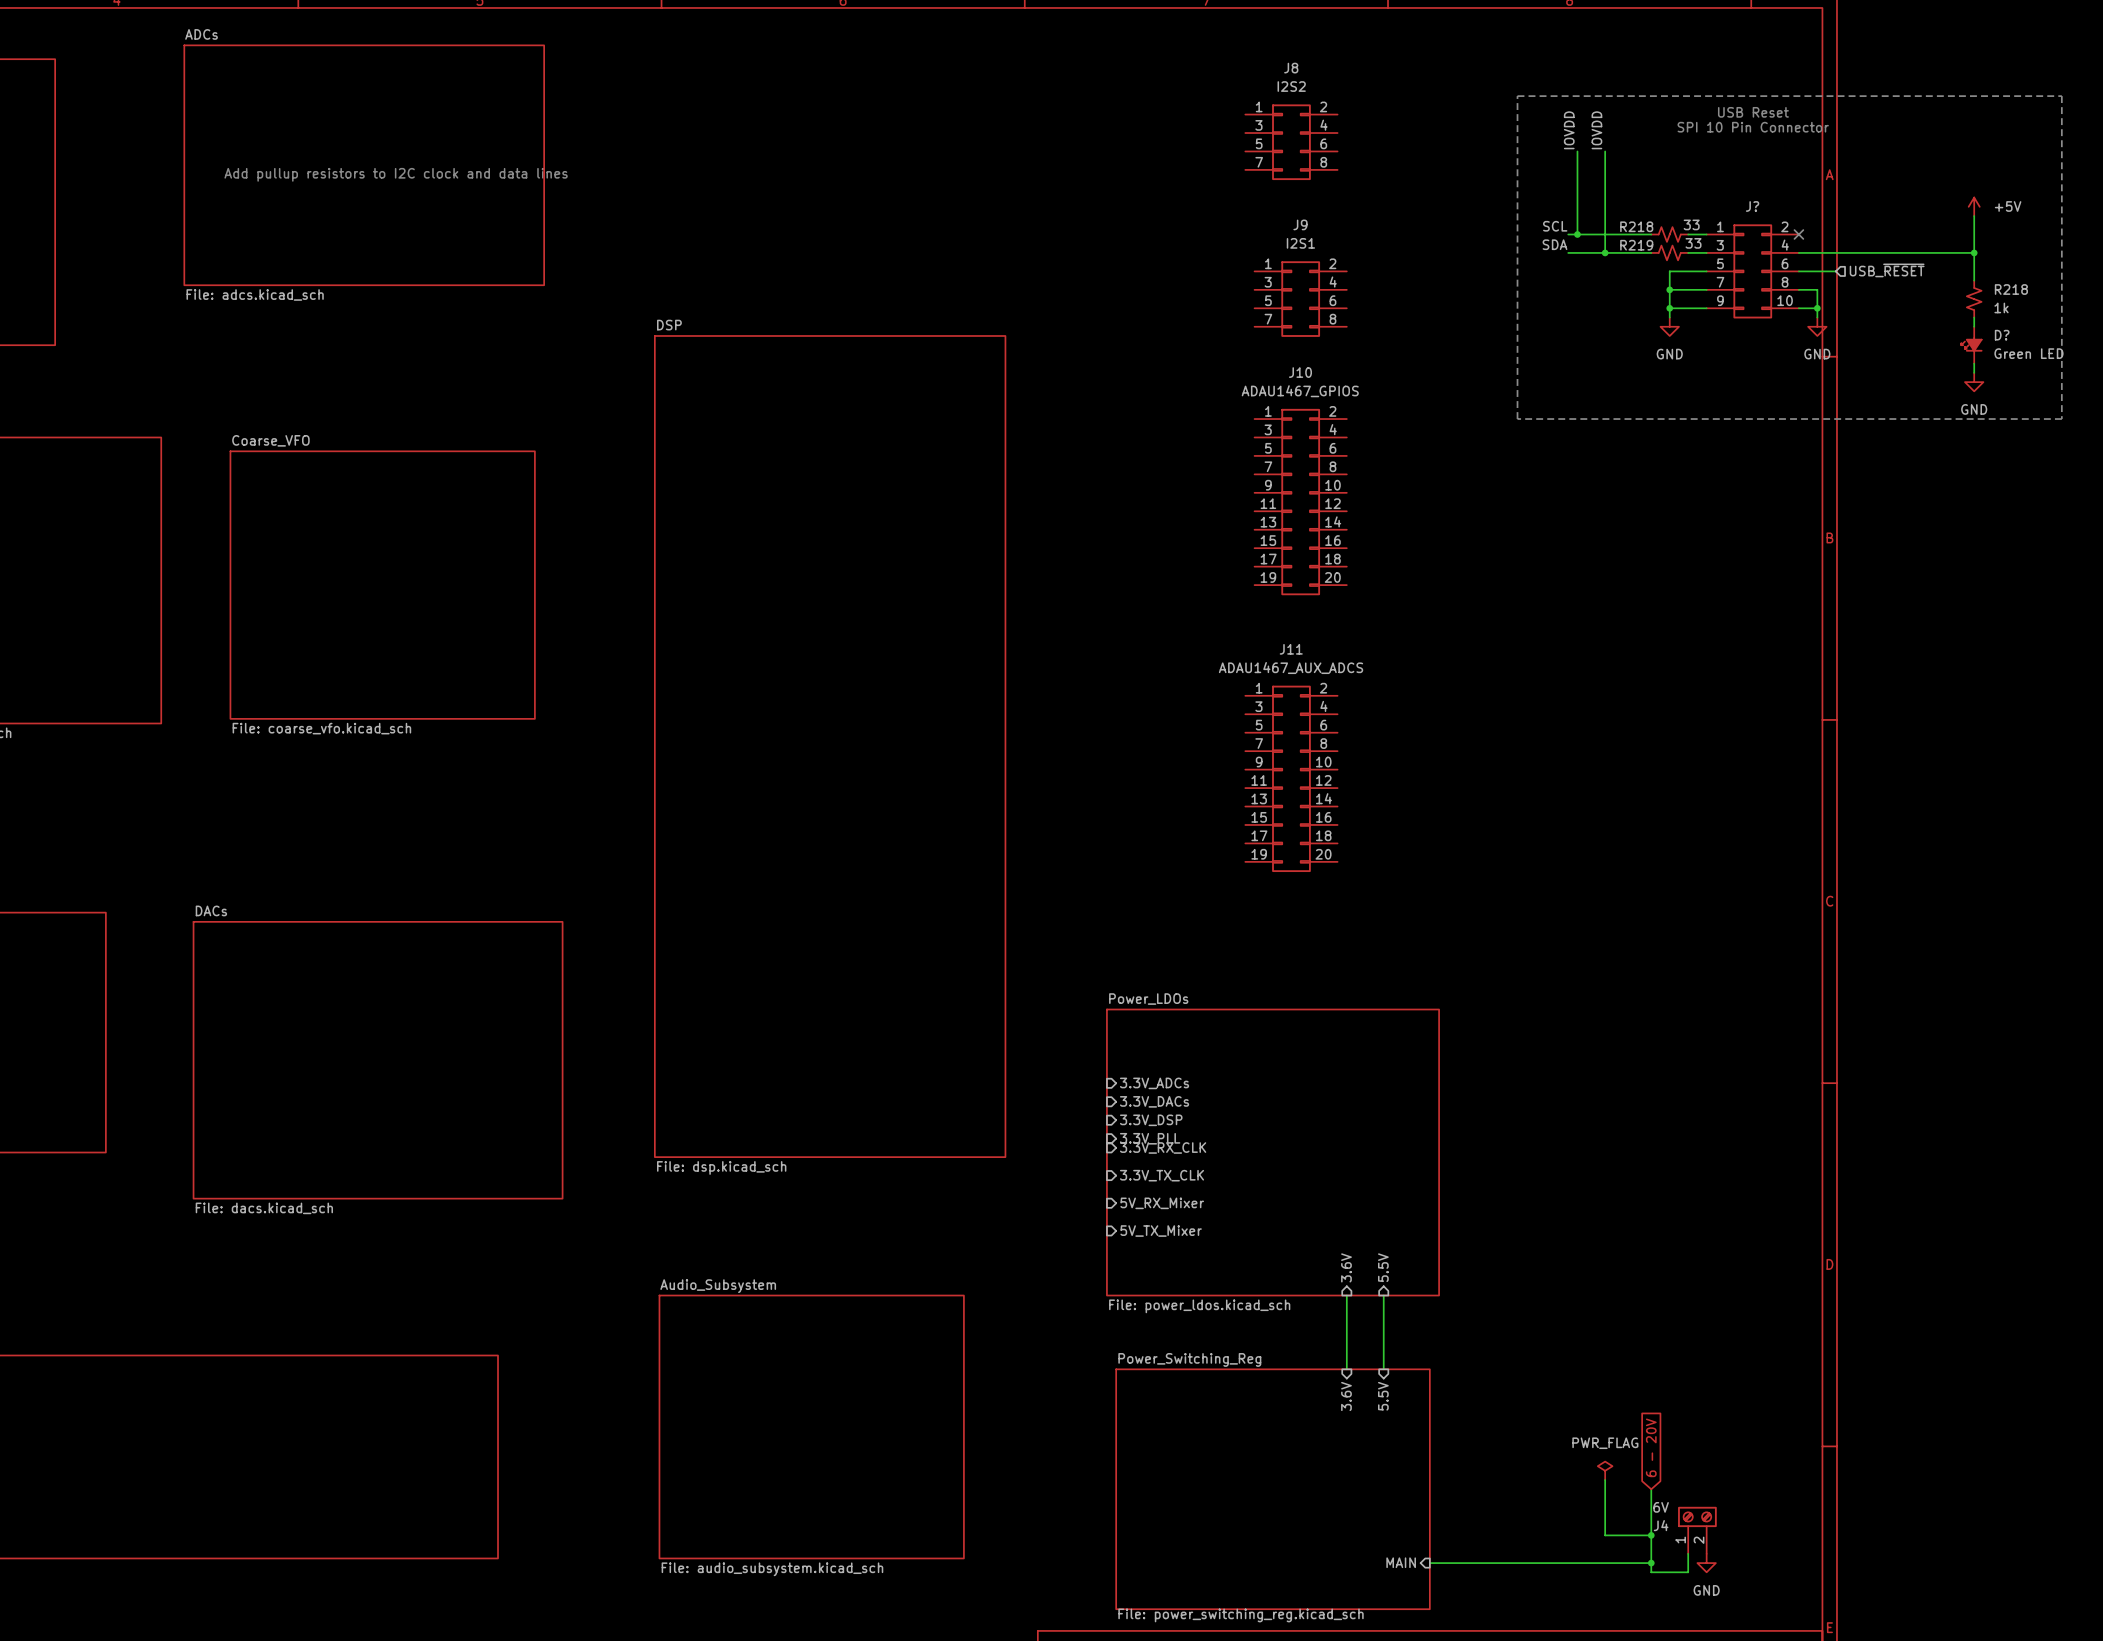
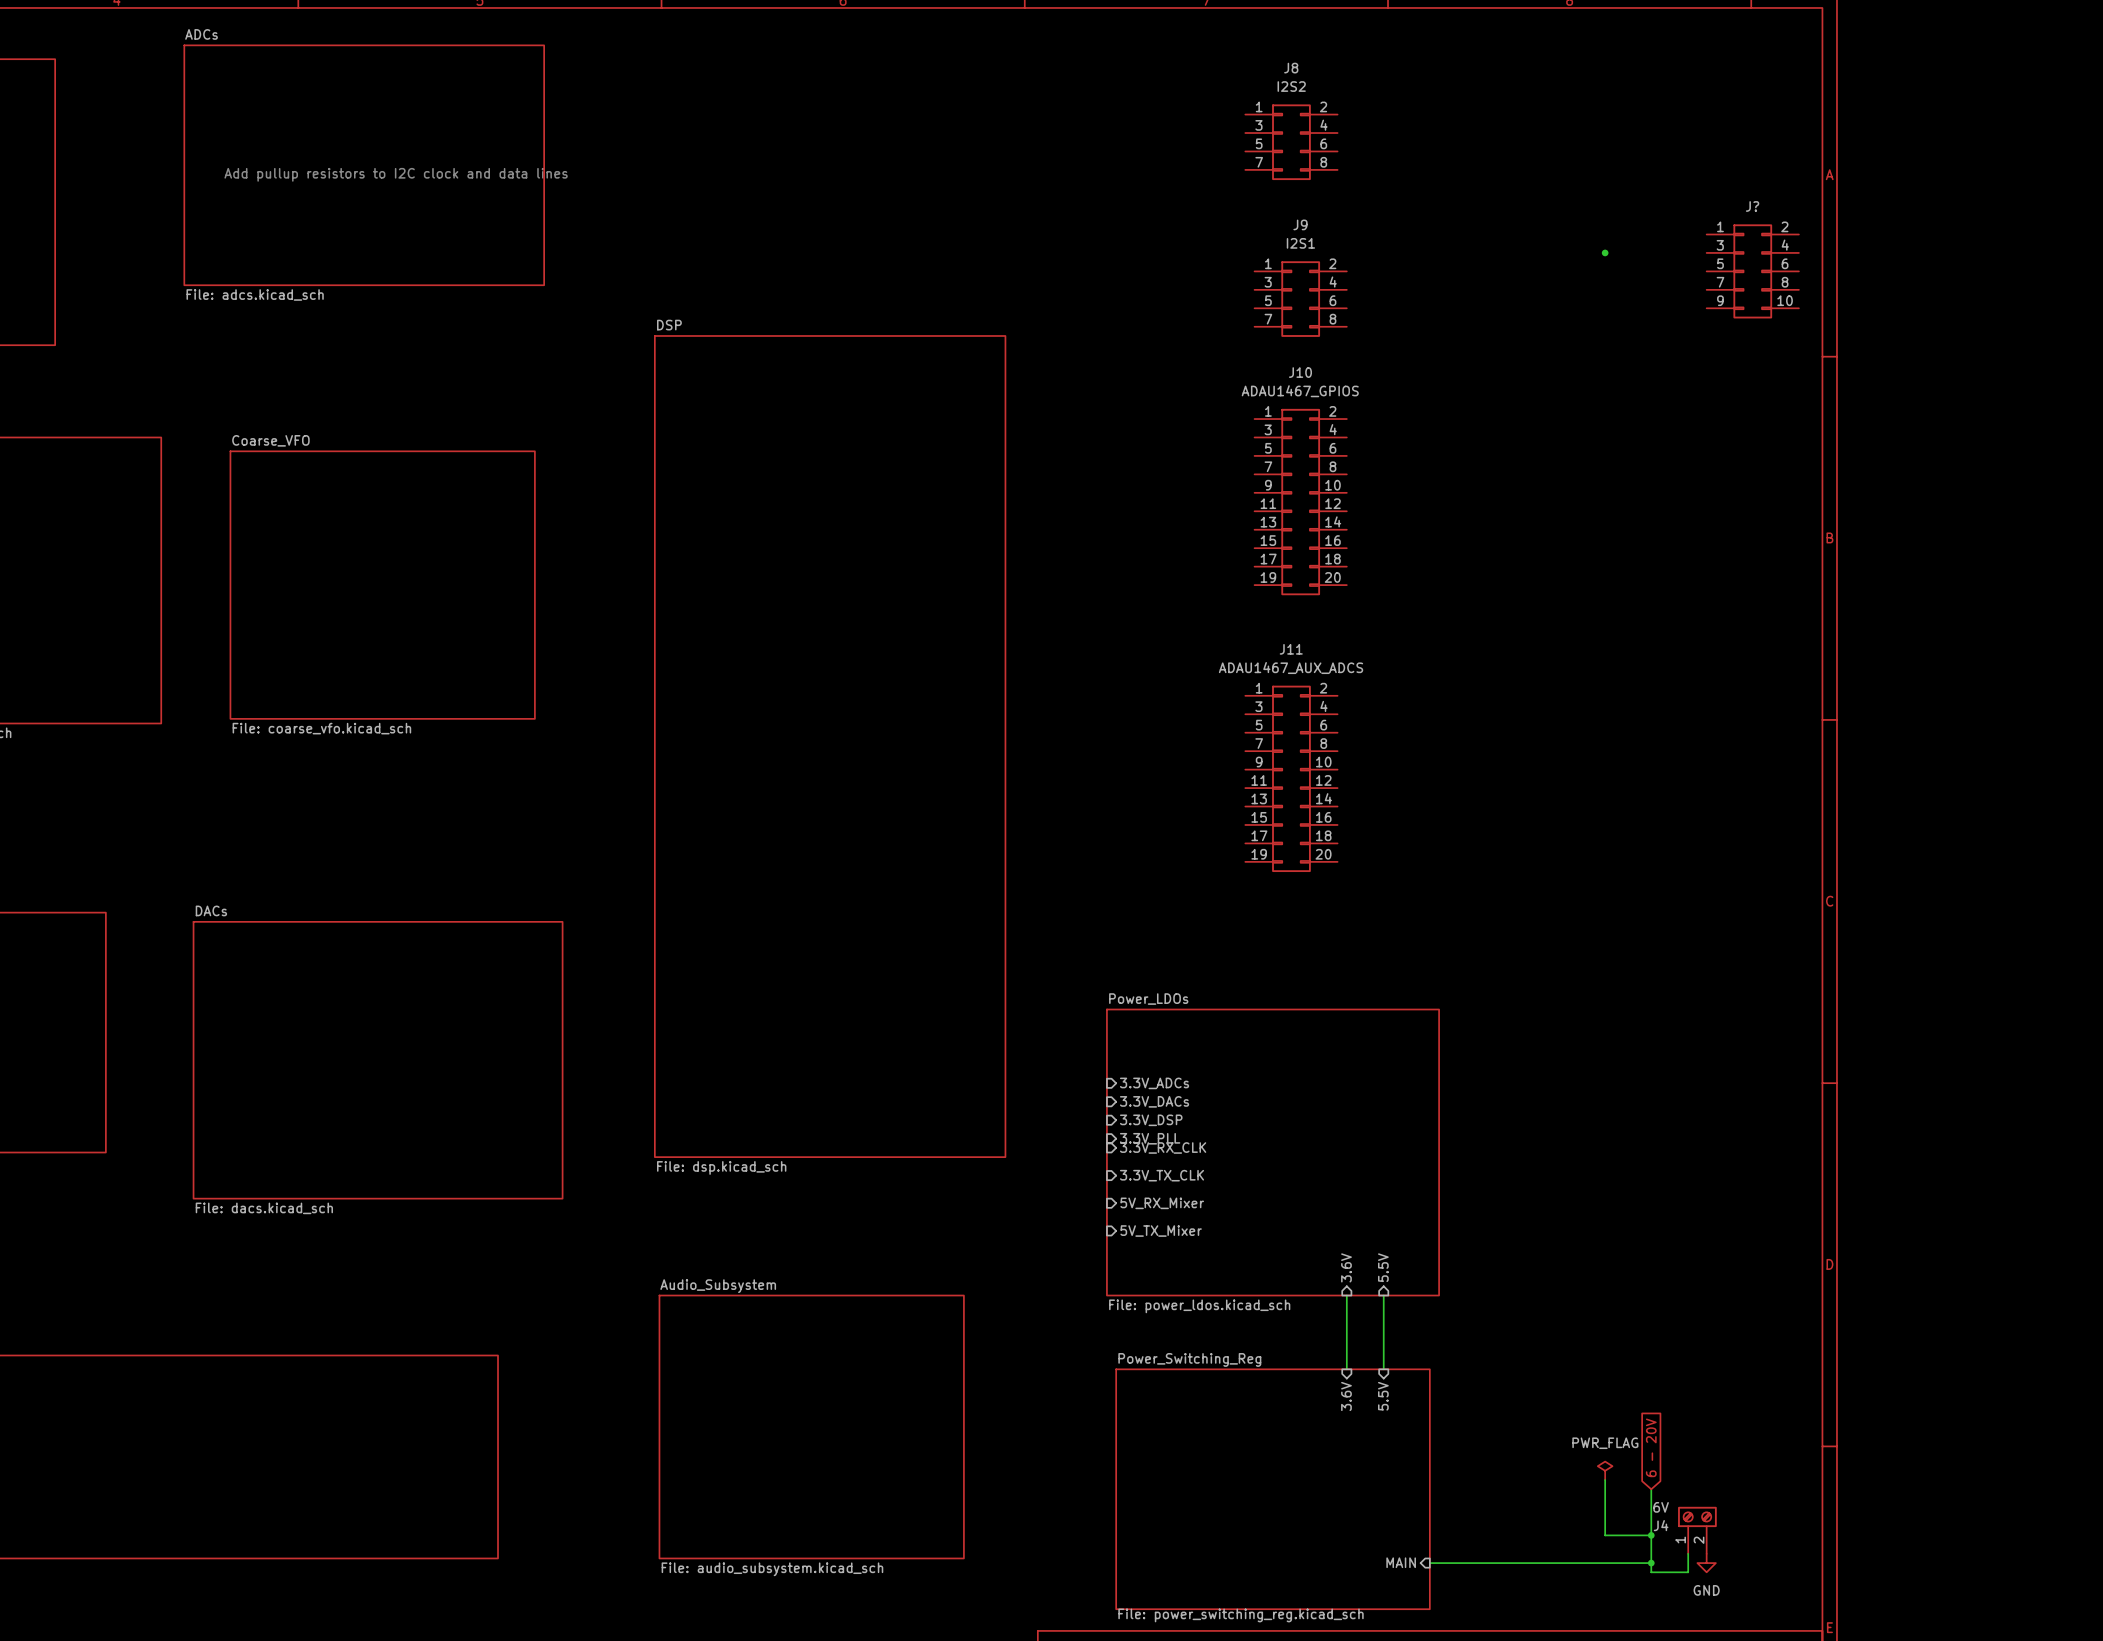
line: (1517, 96) (2061, 96) (2061, 419) (1517, 419) (1517, 96) -> none
text: USB Reset (1753, 112) -> none
text: SPI 10 Pin Connector (1753, 127) -> none
label: IOVDD (1569, 130) -> none
label: IOVDD (1596, 130) -> none
wire: (1577, 151) (1577, 234) -> none
wire: (1605, 151) (1605, 252) -> none
power symbol: +5V (1974, 206) -> none
wire: (1974, 216) (1974, 280) -> none
label: SCL (1555, 226) -> none
wire: (1568, 234) (1651, 234) -> none
junction: (1577, 234) -> none
R218: 33 (1669, 234) -> none
wire: (1688, 234) (1706, 234) -> none
no-connect mark: (1798, 234) -> none
label: SDA (1555, 244) -> none
wire: (1568, 252) (1651, 252) -> none
R219: 33 (1669, 252) -> none
wire: (1688, 252) (1706, 252) -> none
wire: (1798, 252) (1974, 252) -> none
junction: (1974, 252) -> none
hierarchical label: USB_~{RESET} (1887, 270) -> none
wire: (1706, 271) (1669, 271) (1669, 317) -> none
wire: (1798, 271) (1835, 271) -> none
wire: (1669, 289) (1706, 289) -> none
junction: (1669, 289) -> none
wire: (1798, 289) (1817, 289) (1817, 317) -> none
R218: 1k (1974, 299) -> none
wire: (1669, 308) (1706, 308) -> none
junction: (1669, 308) -> none
wire: (1798, 308) (1817, 308) -> none
junction: (1817, 308) -> none
wire: (1974, 317) (1974, 326) -> none
power symbol: GND (1669, 326) -> none
power symbol: GND (1817, 326) -> none
D?: Green LED (1971, 345) -> none
wire: (1974, 363) (1974, 372) -> none
power symbol: GND (1974, 382) -> none

